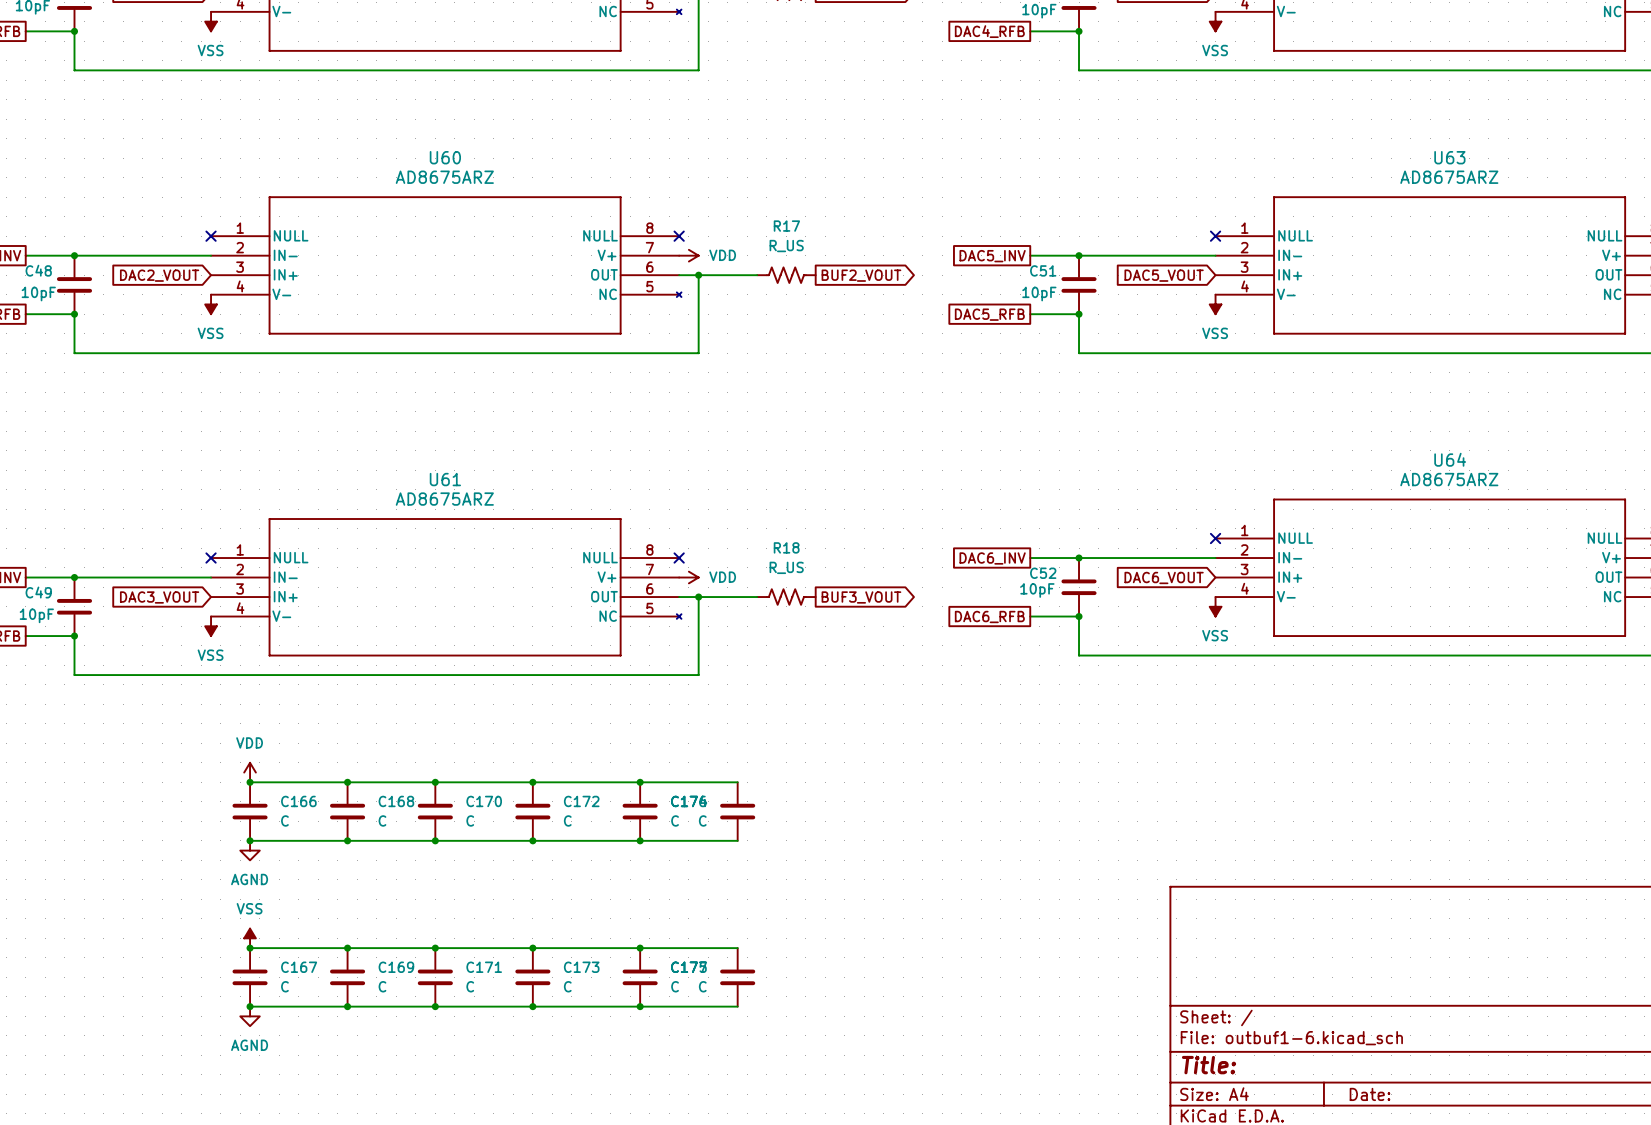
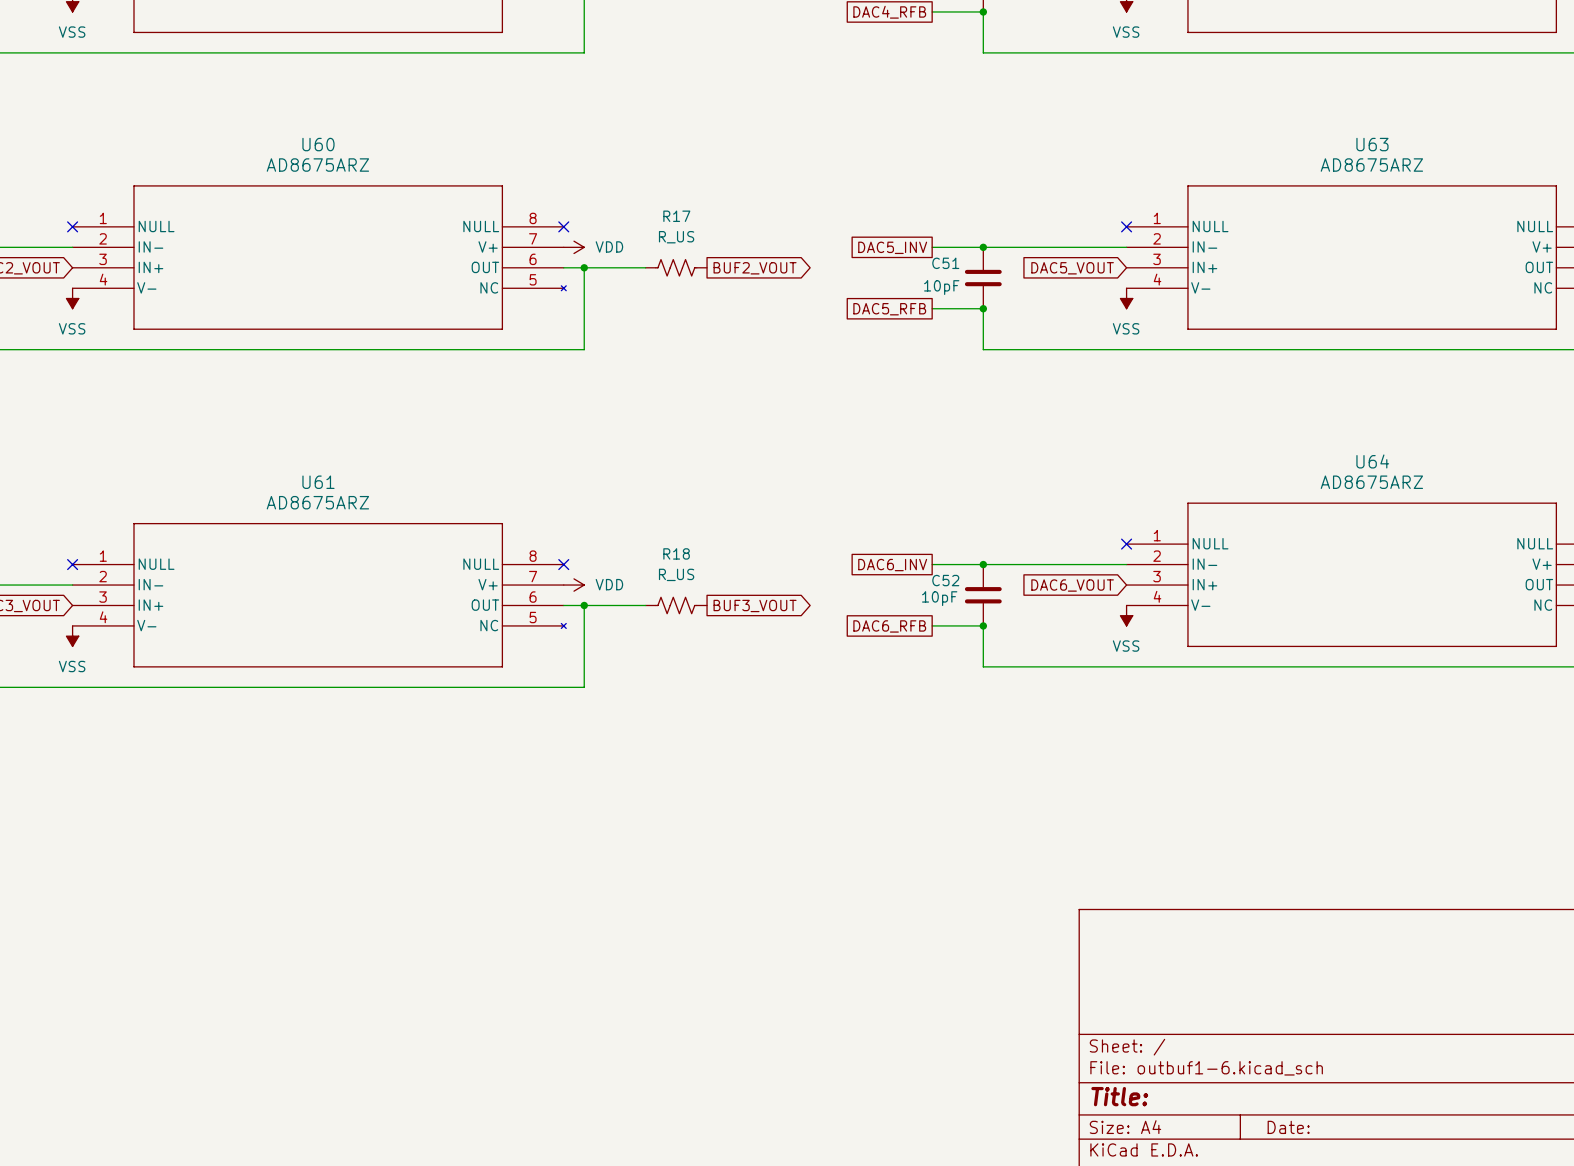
power symbol: VDD (250, 772) -> none
wire: (250, 782) (737, 782) -> none
junction: (250, 782) -> none
junction: (347, 782) -> none
junction: (435, 782) -> none
junction: (532, 782) -> none
junction: (640, 782) -> none
C166: C (250, 811) -> none
C168: C (347, 811) -> none
C170: C (435, 811) -> none
C172: C (532, 811) -> none
part: C (640, 811) -> none
part: C (737, 811) -> none
wire: (250, 840) (737, 840) -> none
junction: (250, 840) -> none
junction: (347, 840) -> none
junction: (435, 840) -> none
junction: (532, 840) -> none
junction: (640, 840) -> none
power symbol: AGND (250, 850) -> none
power symbol: VSS (250, 938) -> none
wire: (250, 948) (737, 948) -> none
junction: (250, 948) -> none
junction: (347, 948) -> none
junction: (435, 948) -> none
junction: (532, 948) -> none
junction: (640, 948) -> none
C167: C (250, 977) -> none
C169: C (347, 977) -> none
C171: C (435, 977) -> none
C173: C (532, 977) -> none
part: C (640, 977) -> none
part: C (737, 977) -> none
wire: (250, 1006) (737, 1006) -> none
junction: (250, 1006) -> none
junction: (347, 1006) -> none
junction: (435, 1006) -> none
junction: (532, 1006) -> none
junction: (640, 1006) -> none
power symbol: AGND (250, 1016) -> none

